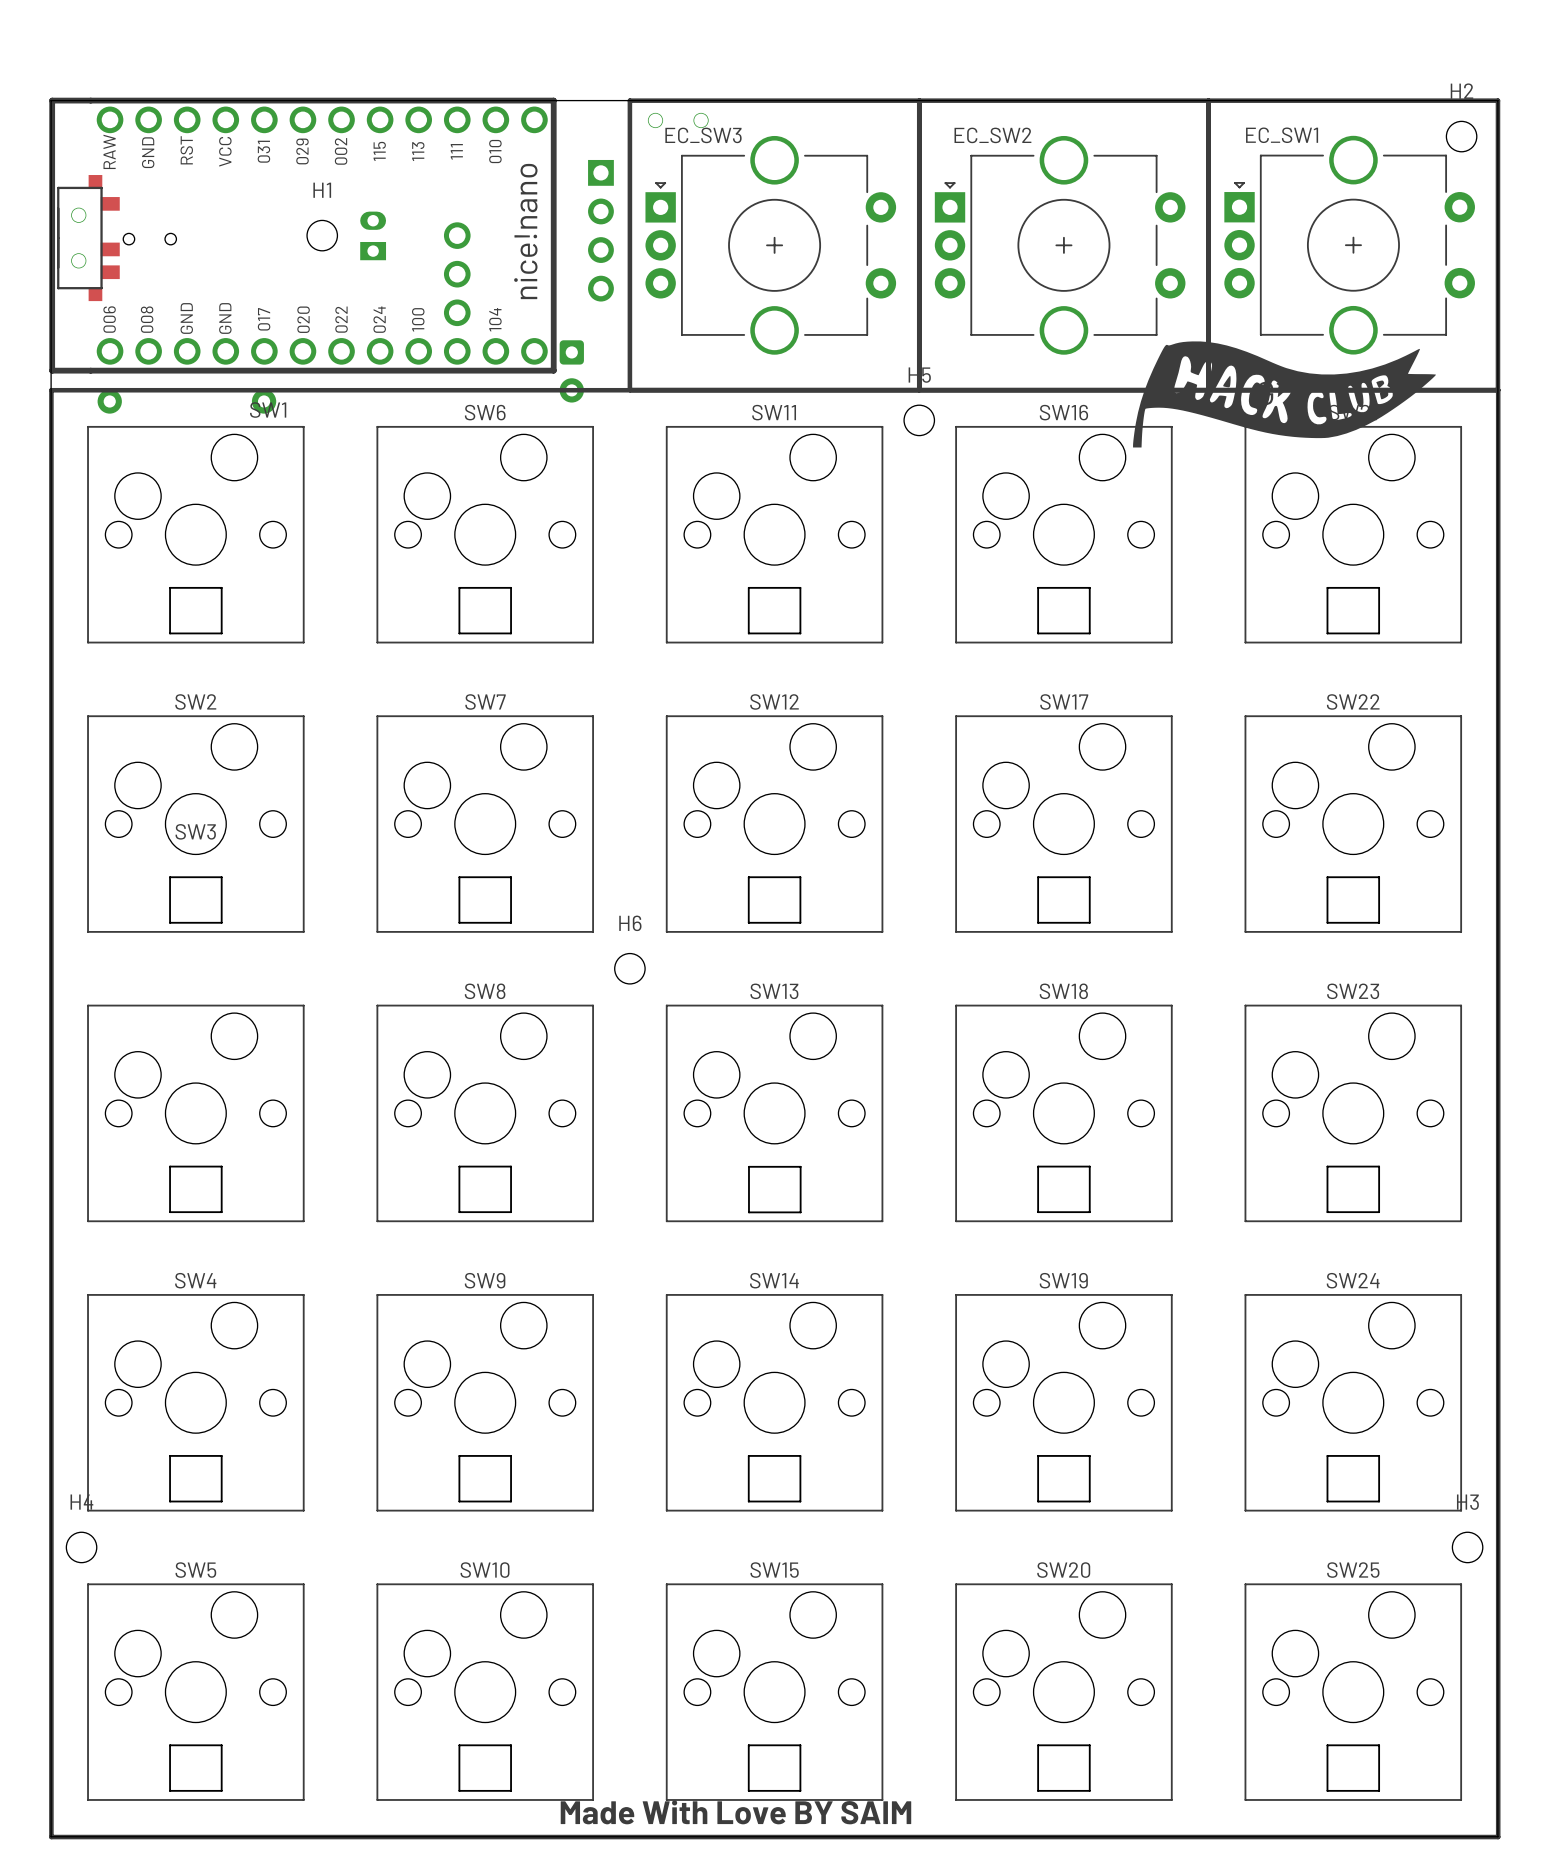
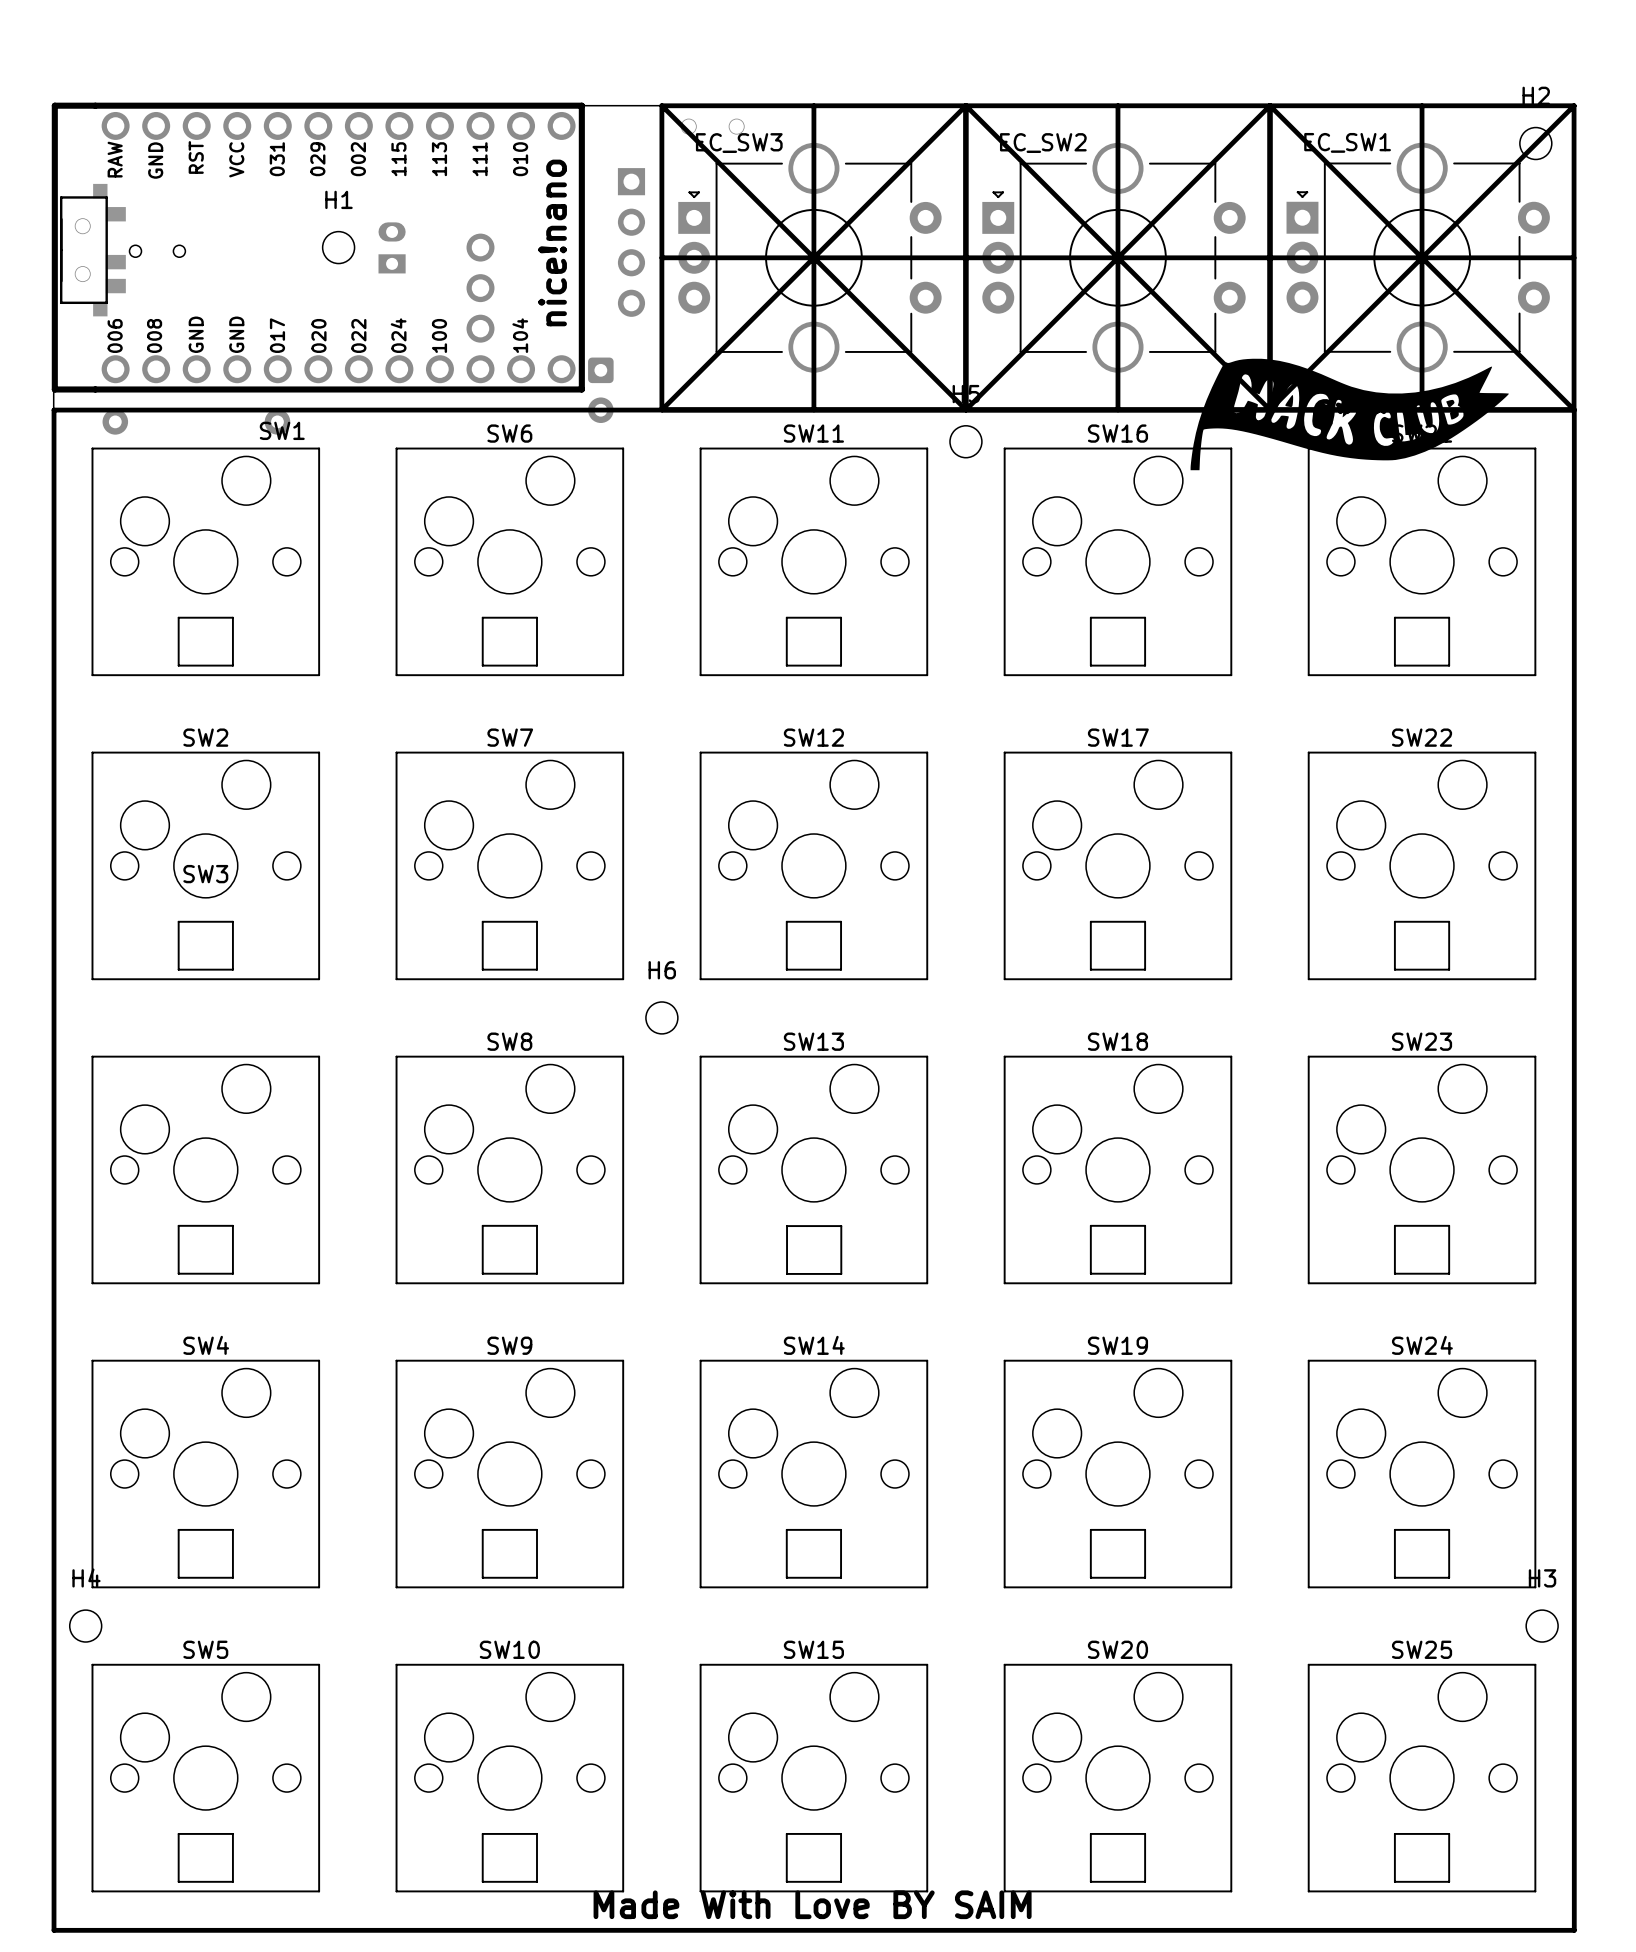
line: none -> (661, 105) (965, 409) (1270, 105) (1574, 409)
line: none -> (813, 105) (813, 409)
line: none -> (1117, 105) (1117, 409)
line: none -> (1422, 105) (1422, 409)
line: none -> (1574, 105) (1270, 409) (965, 105) (661, 409)
line: none -> (661, 257) (1574, 257)

